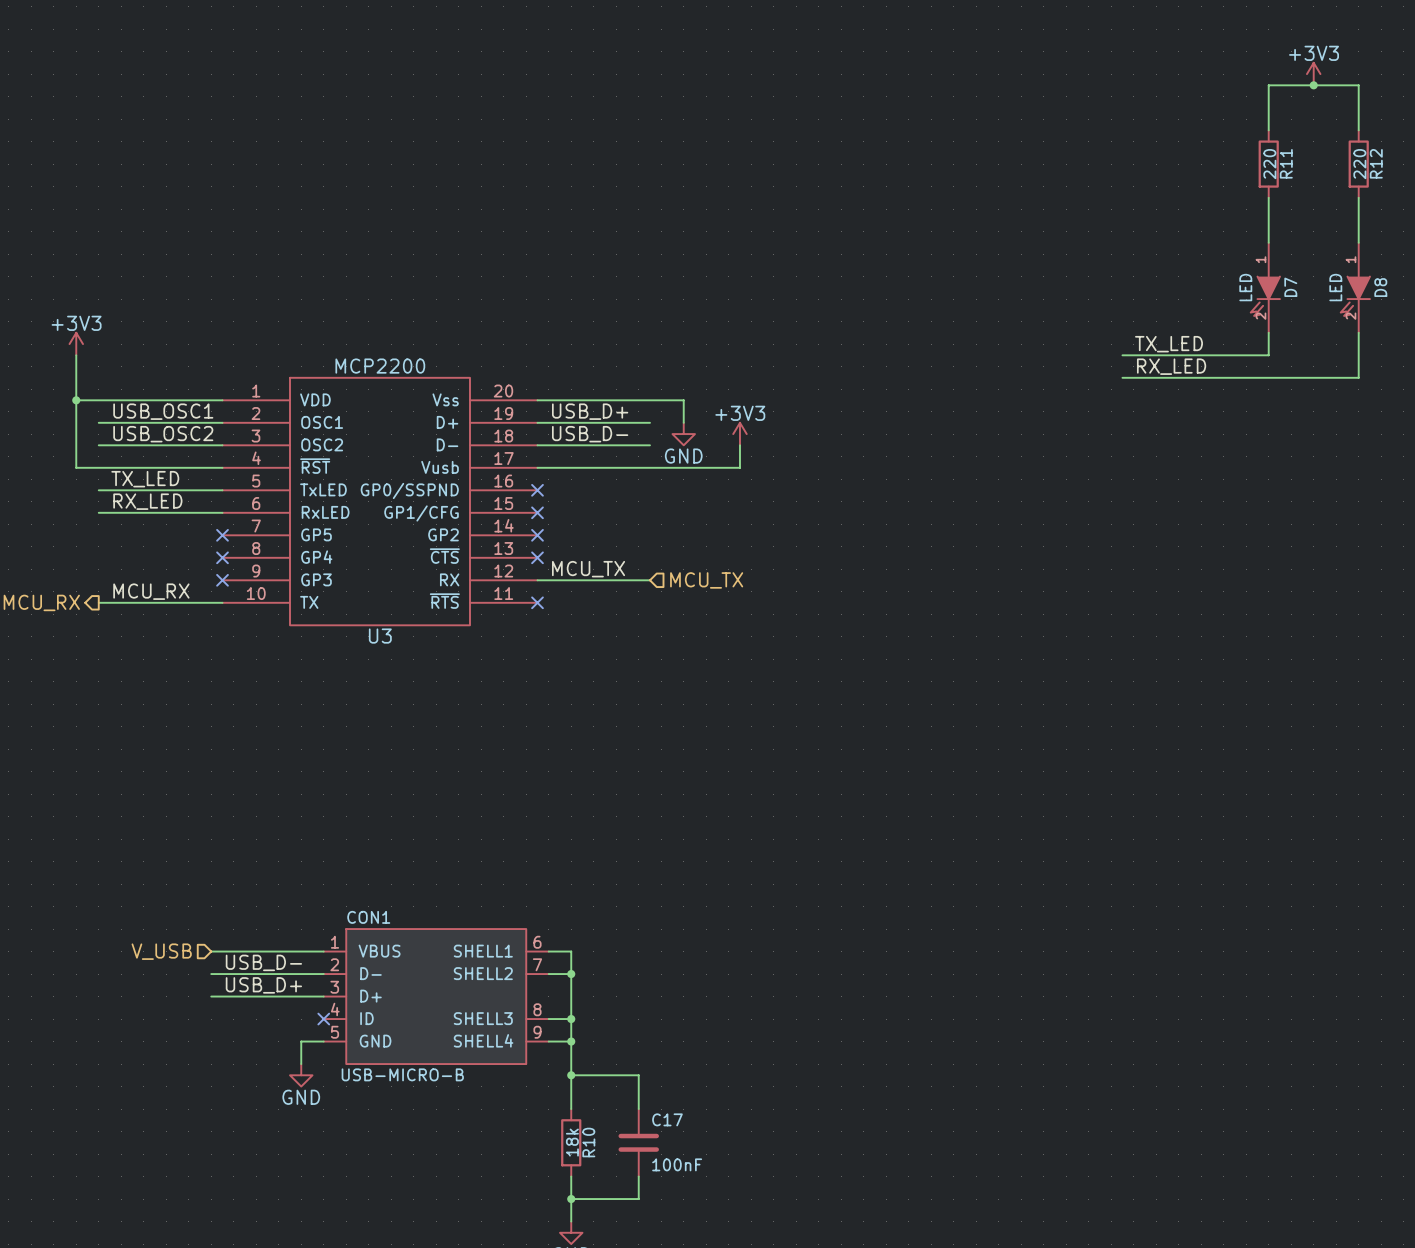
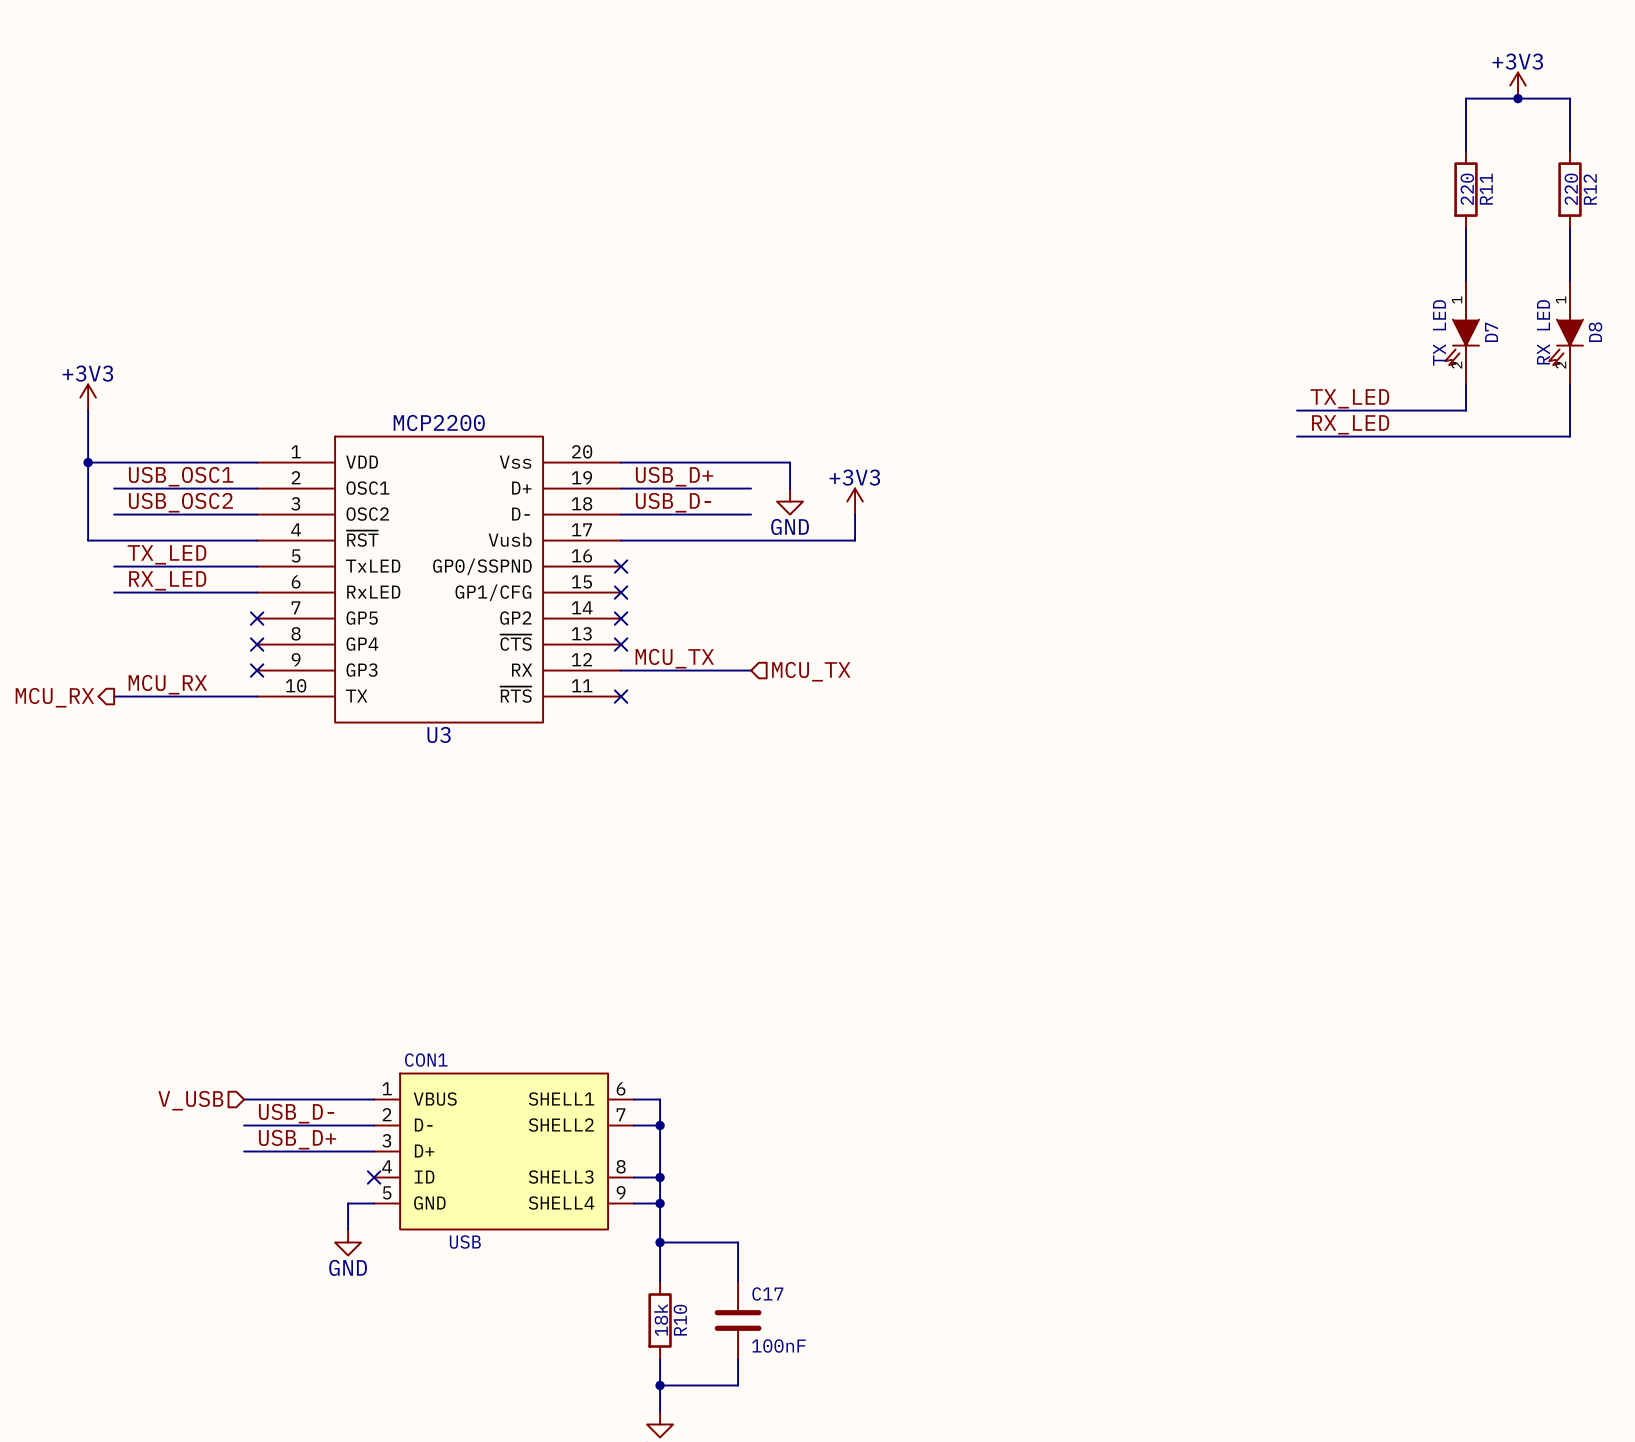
D7 value: LED (1245, 287) -> TX LED (1439, 332)
D8 value: LED (1335, 287) -> RX LED (1543, 332)
CON1 value: USB-MICRO-B (402, 1074) -> USB (465, 1242)

